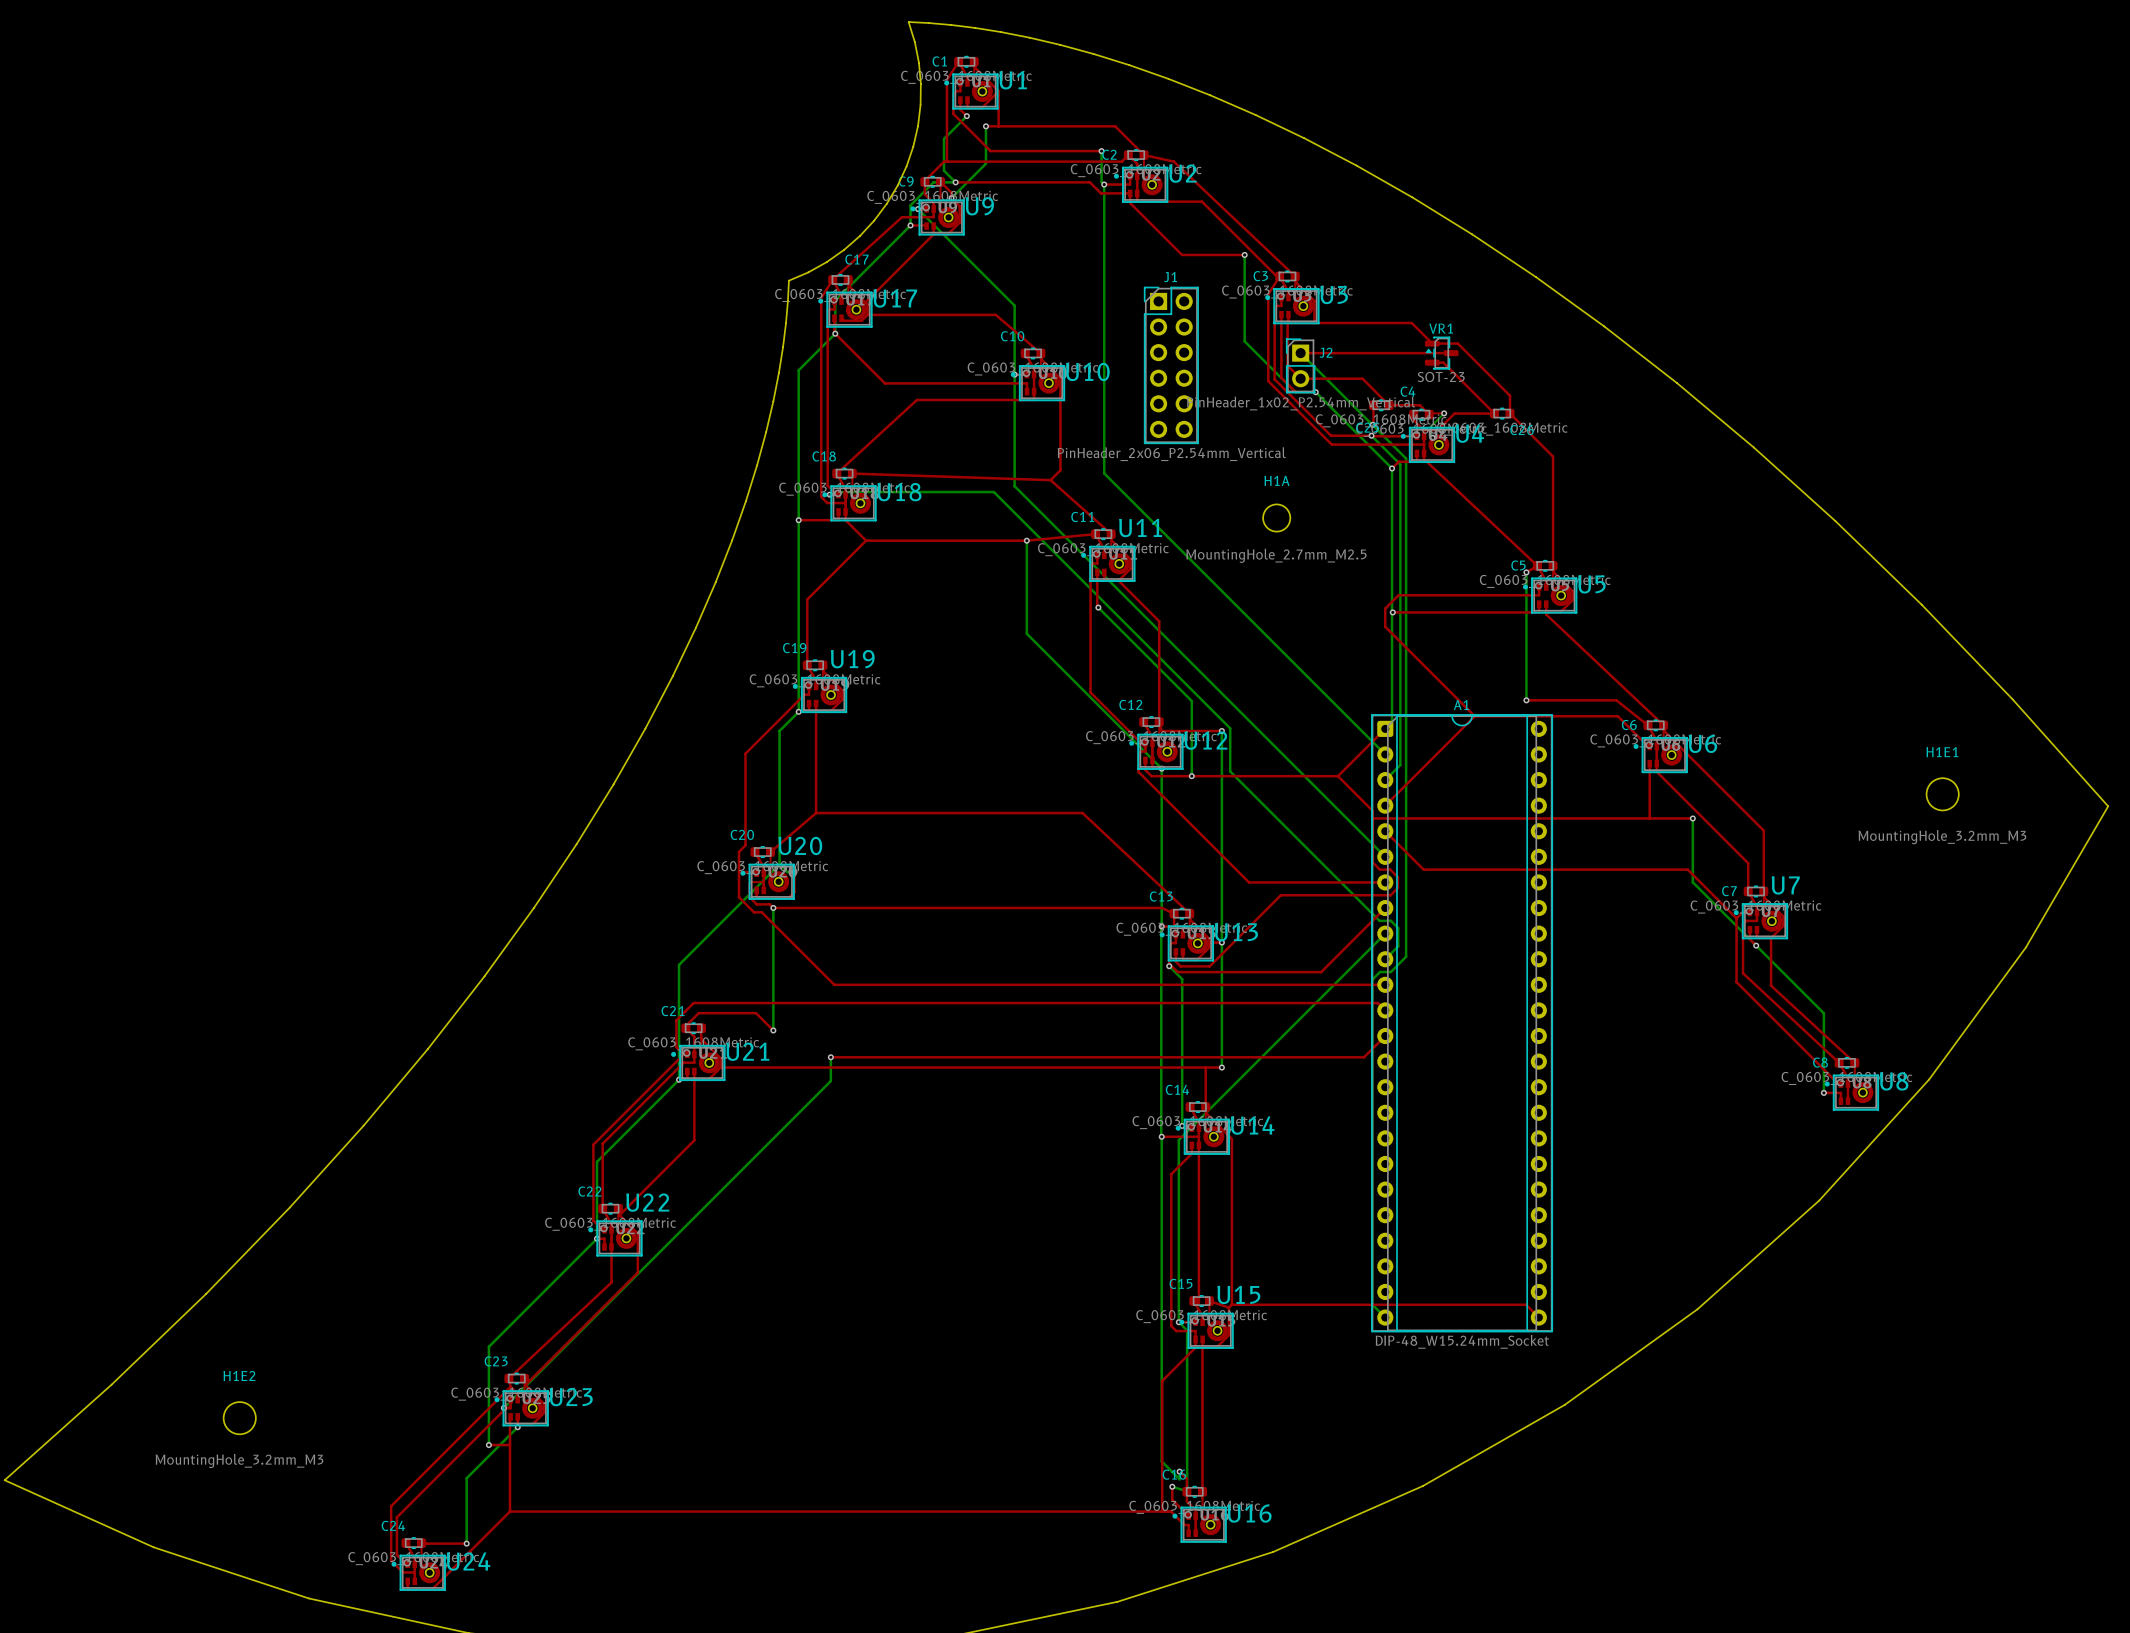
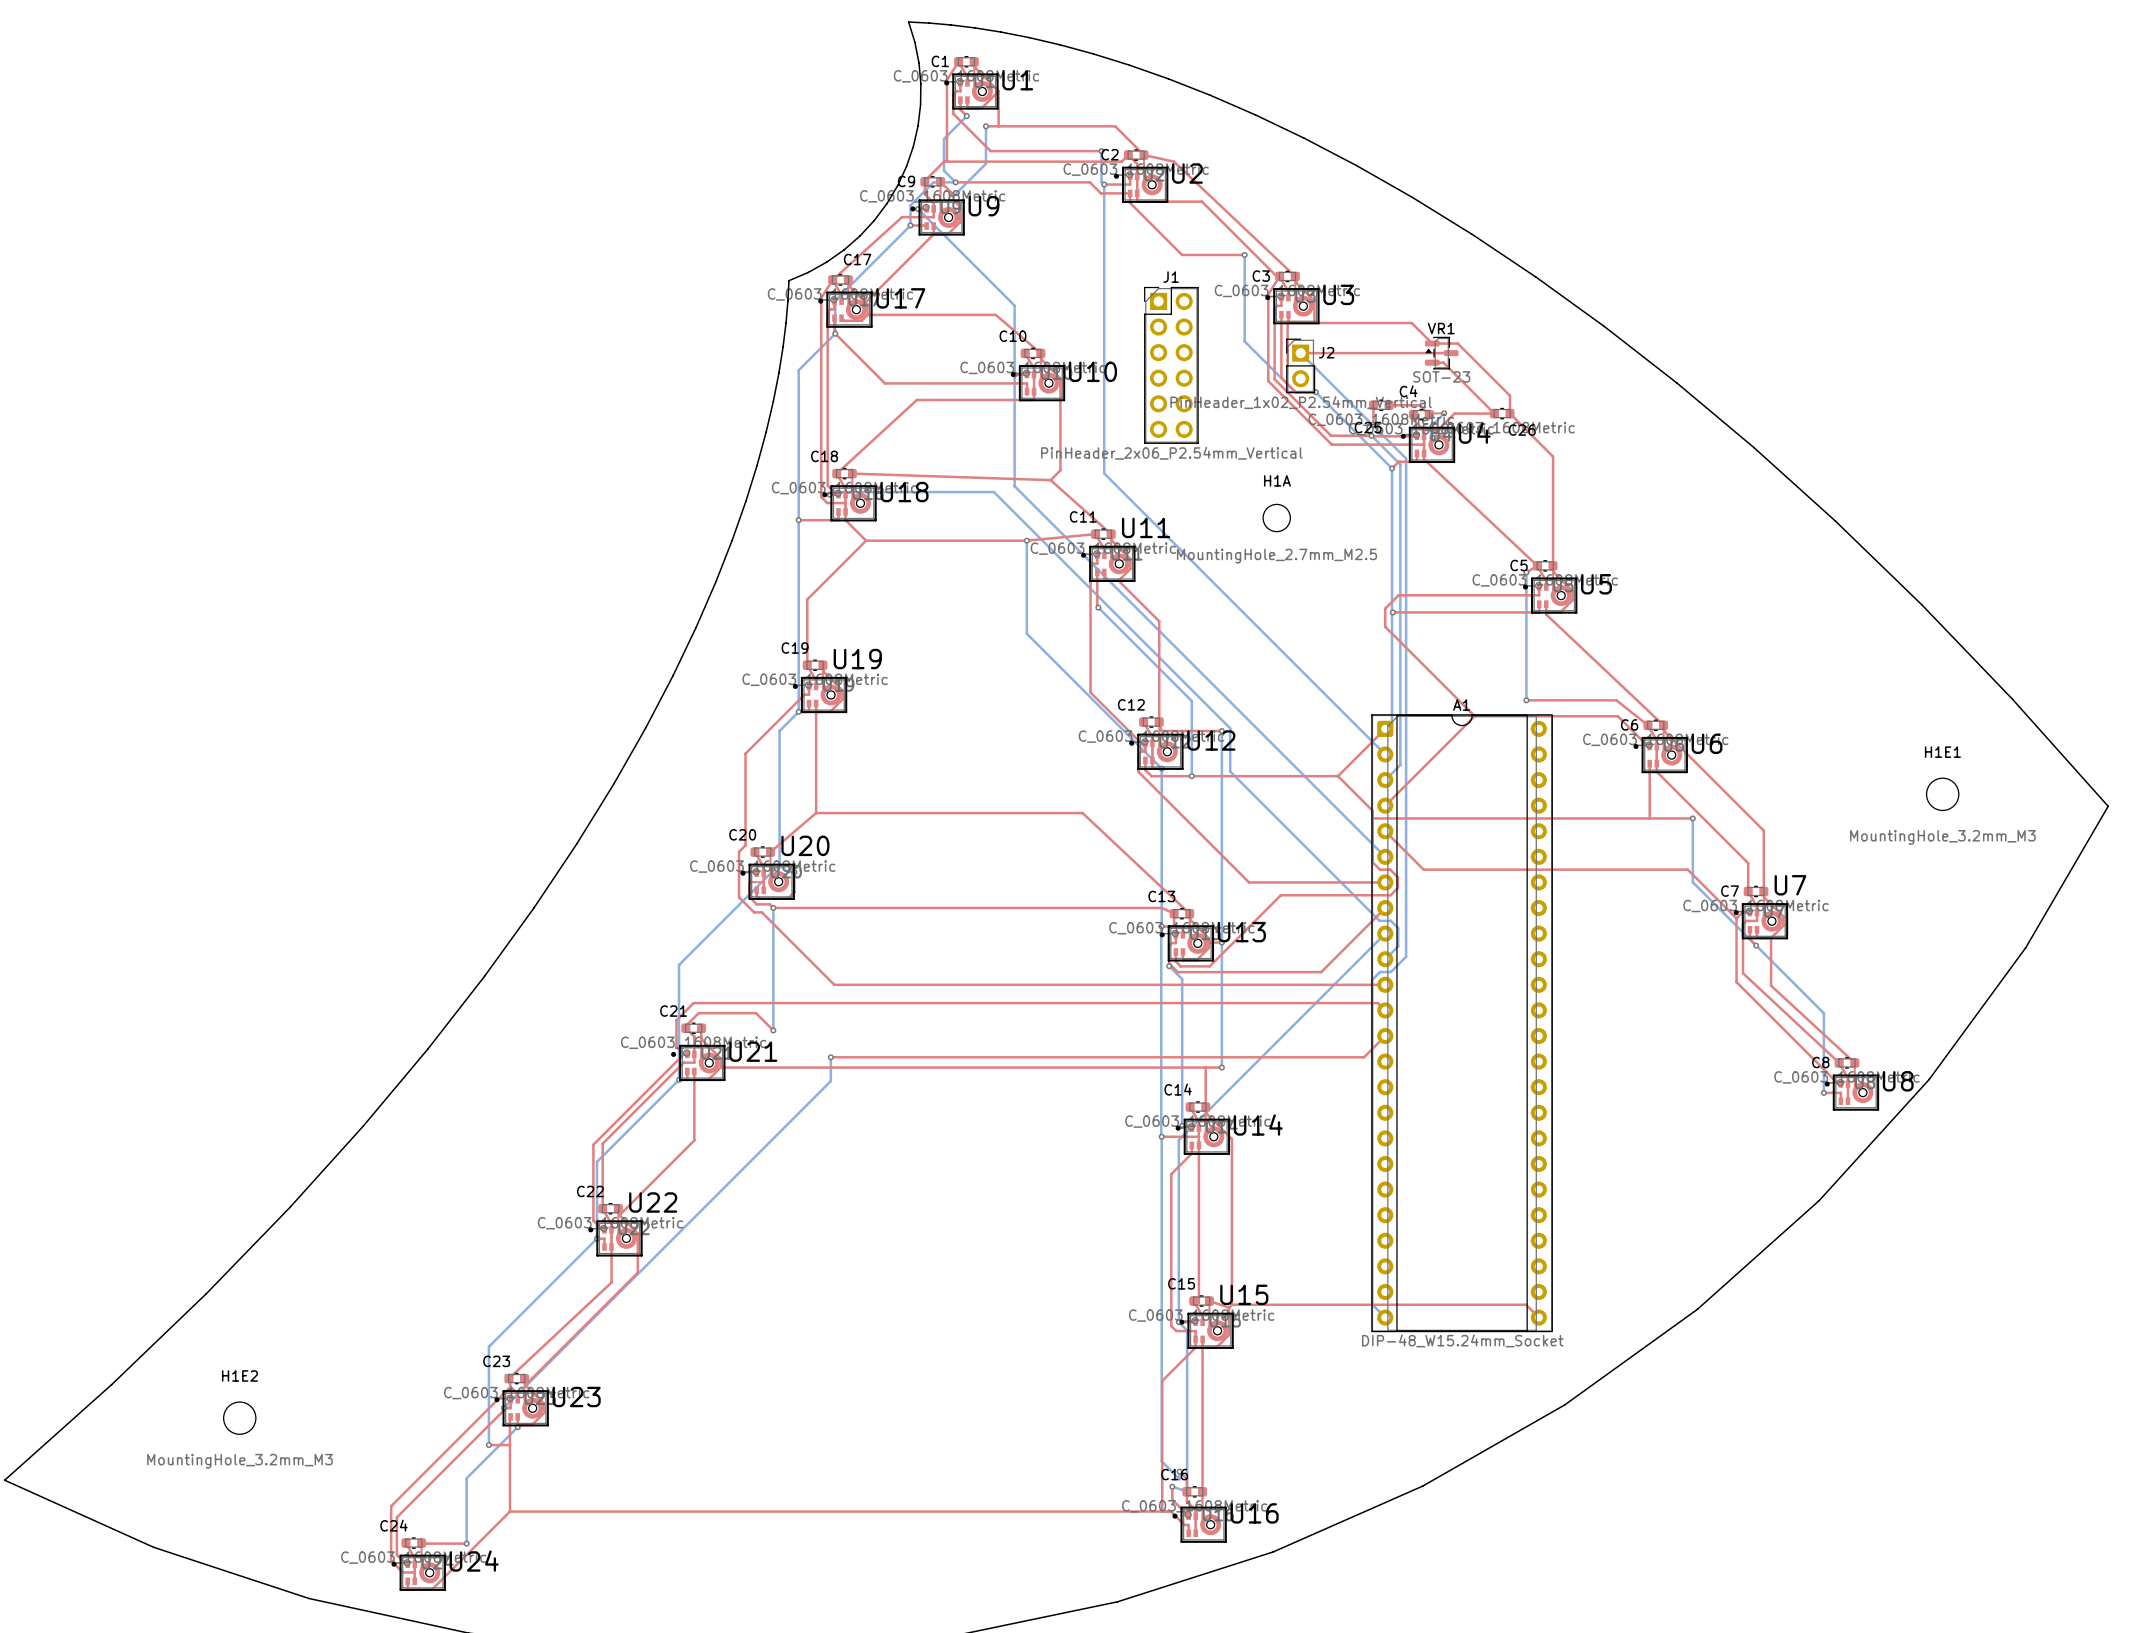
top track: (1287, 365) (1300, 378) (1362, 378) (1389, 405) -> none

